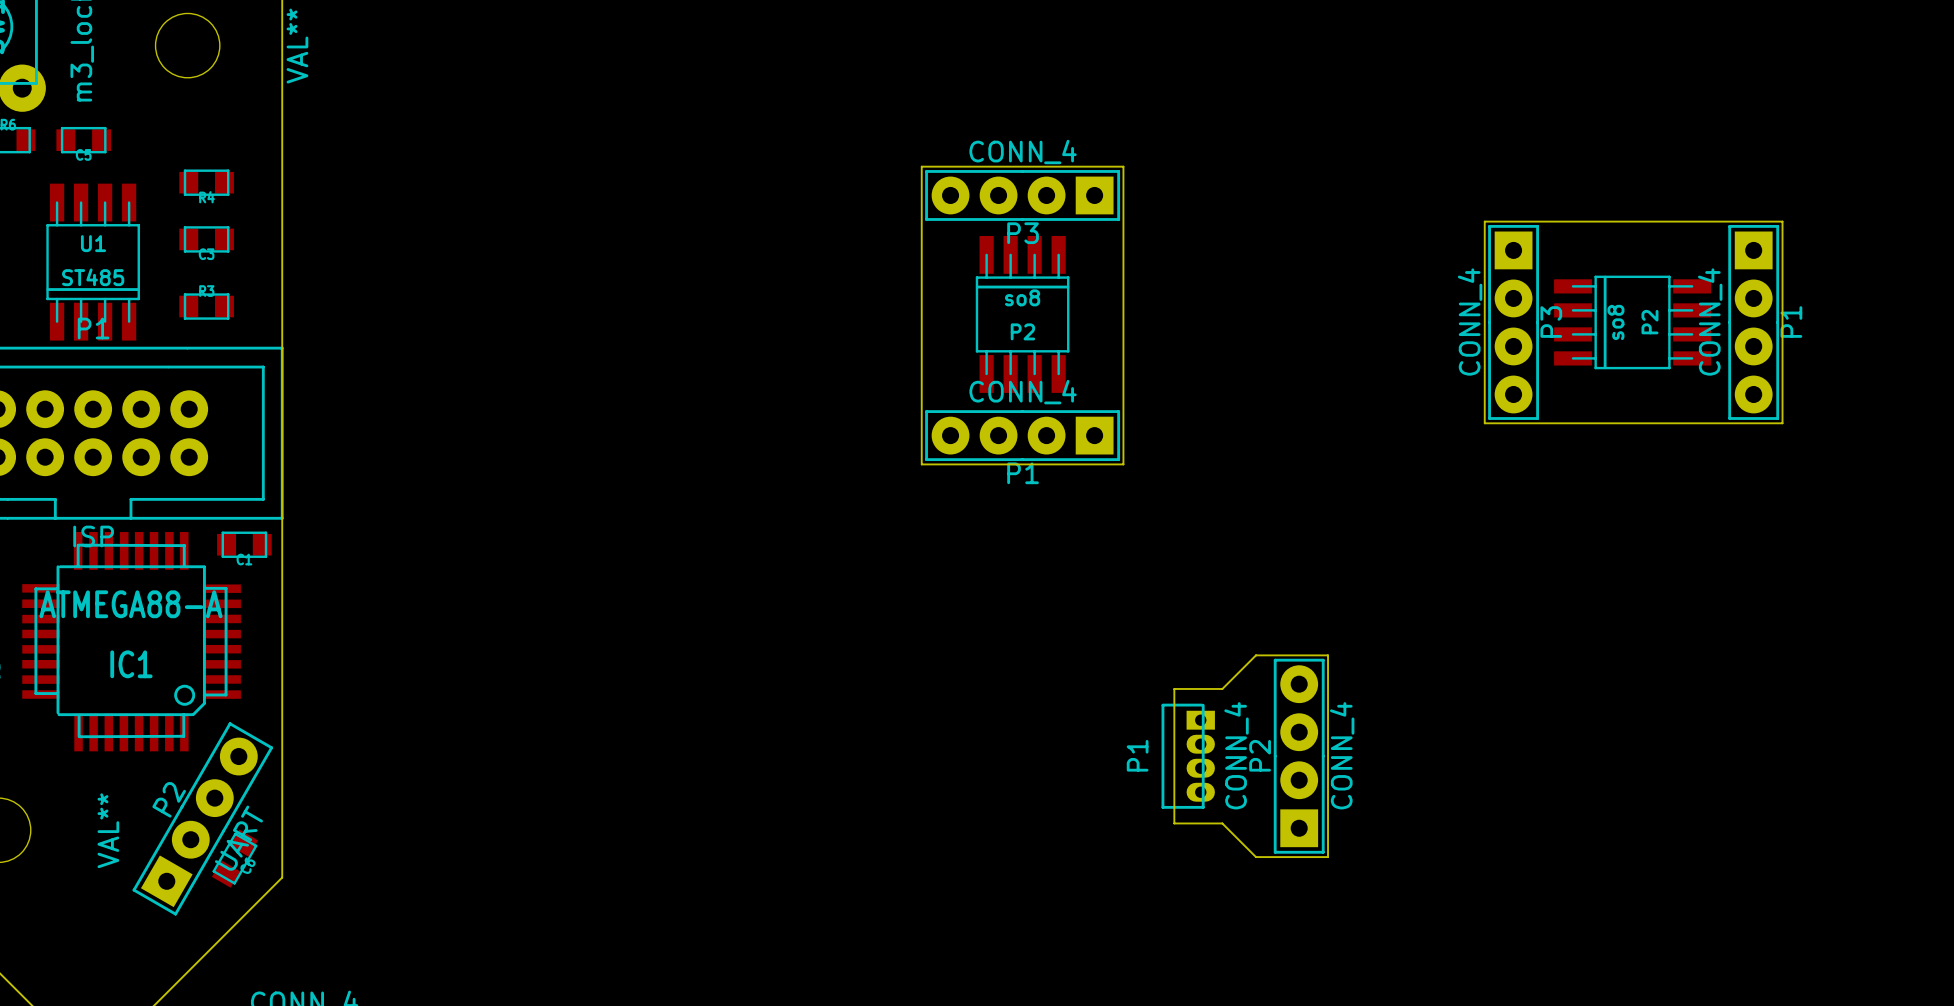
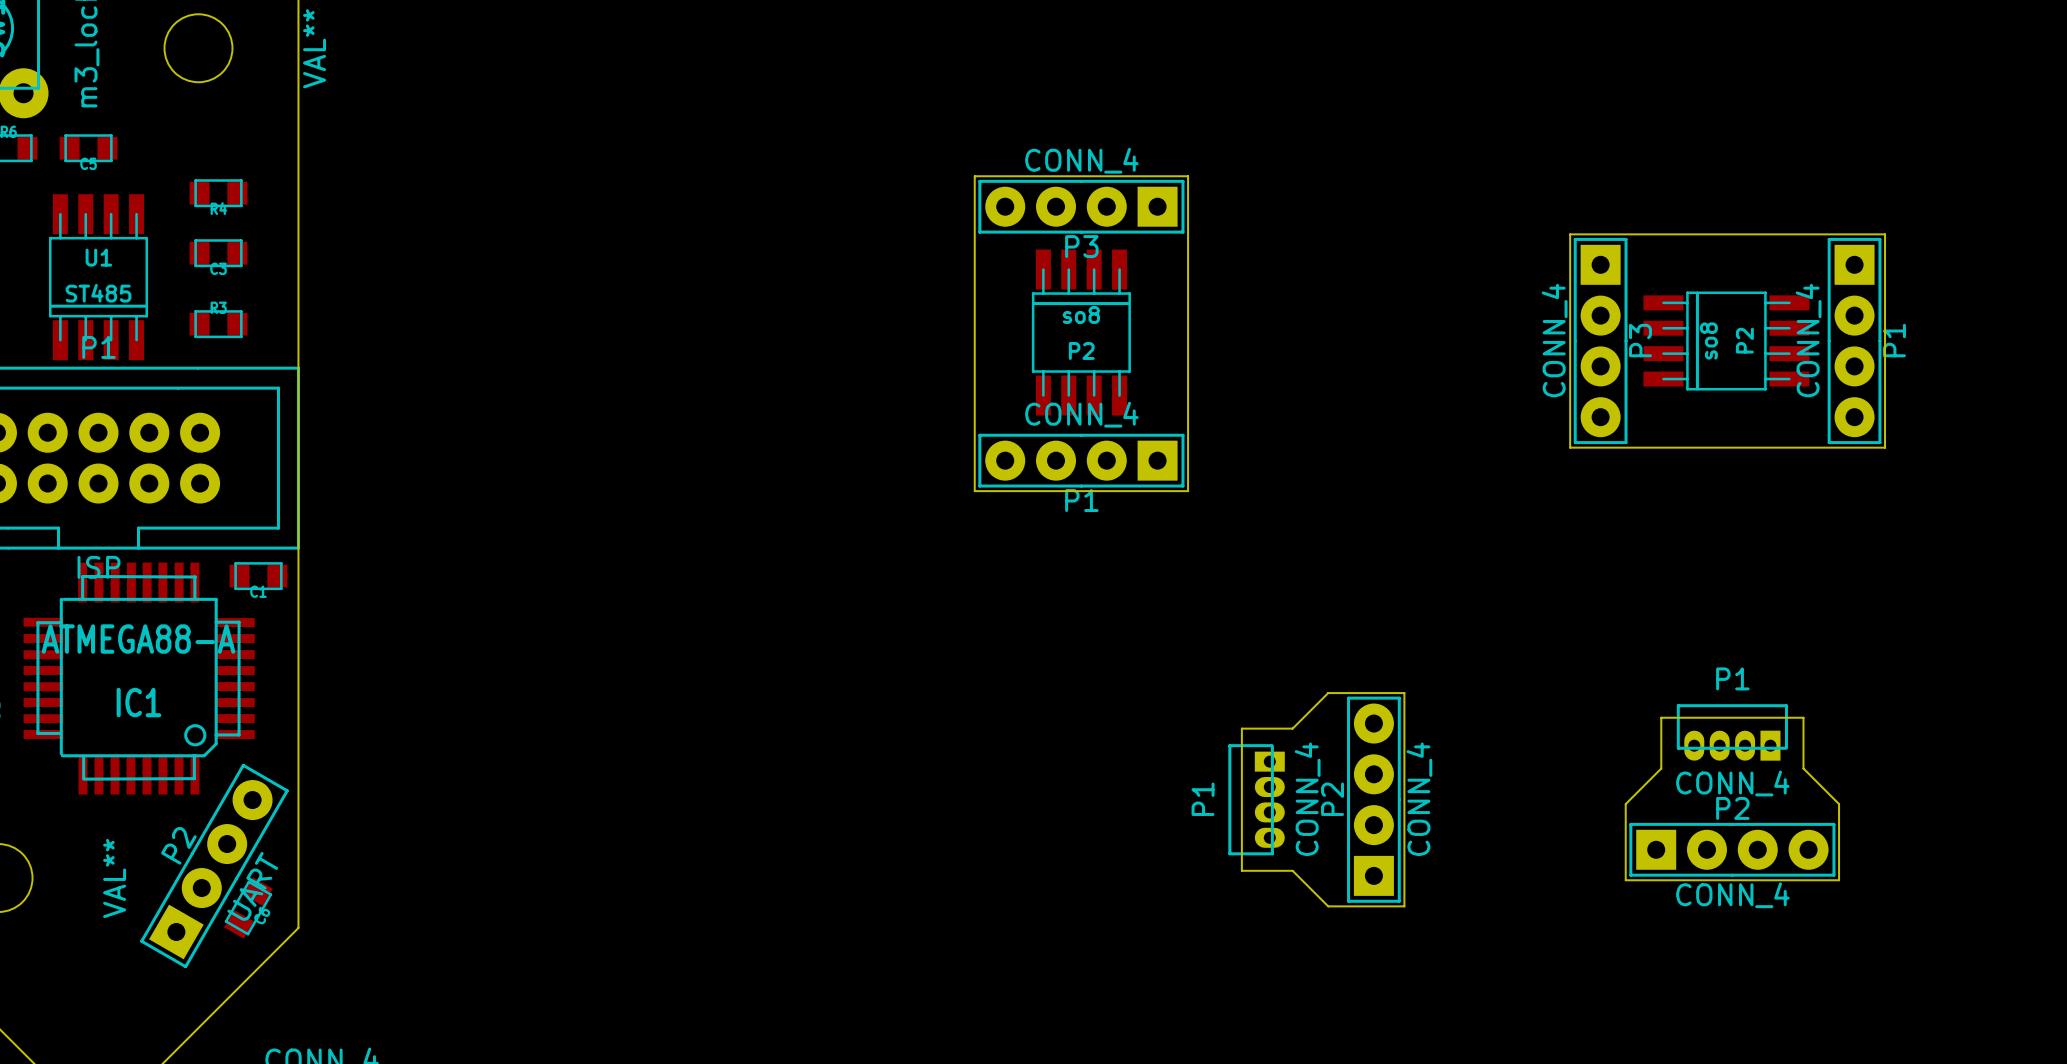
board edge: none -> (1661, 717) (1803, 717) (1803, 768) (1839, 804) (1839, 880) (1625, 880) (1625, 804) (1661, 768) (1661, 717)
P1: none -> CONN_4 (1732, 732)
P2: none -> CONN_4 (1732, 849)

